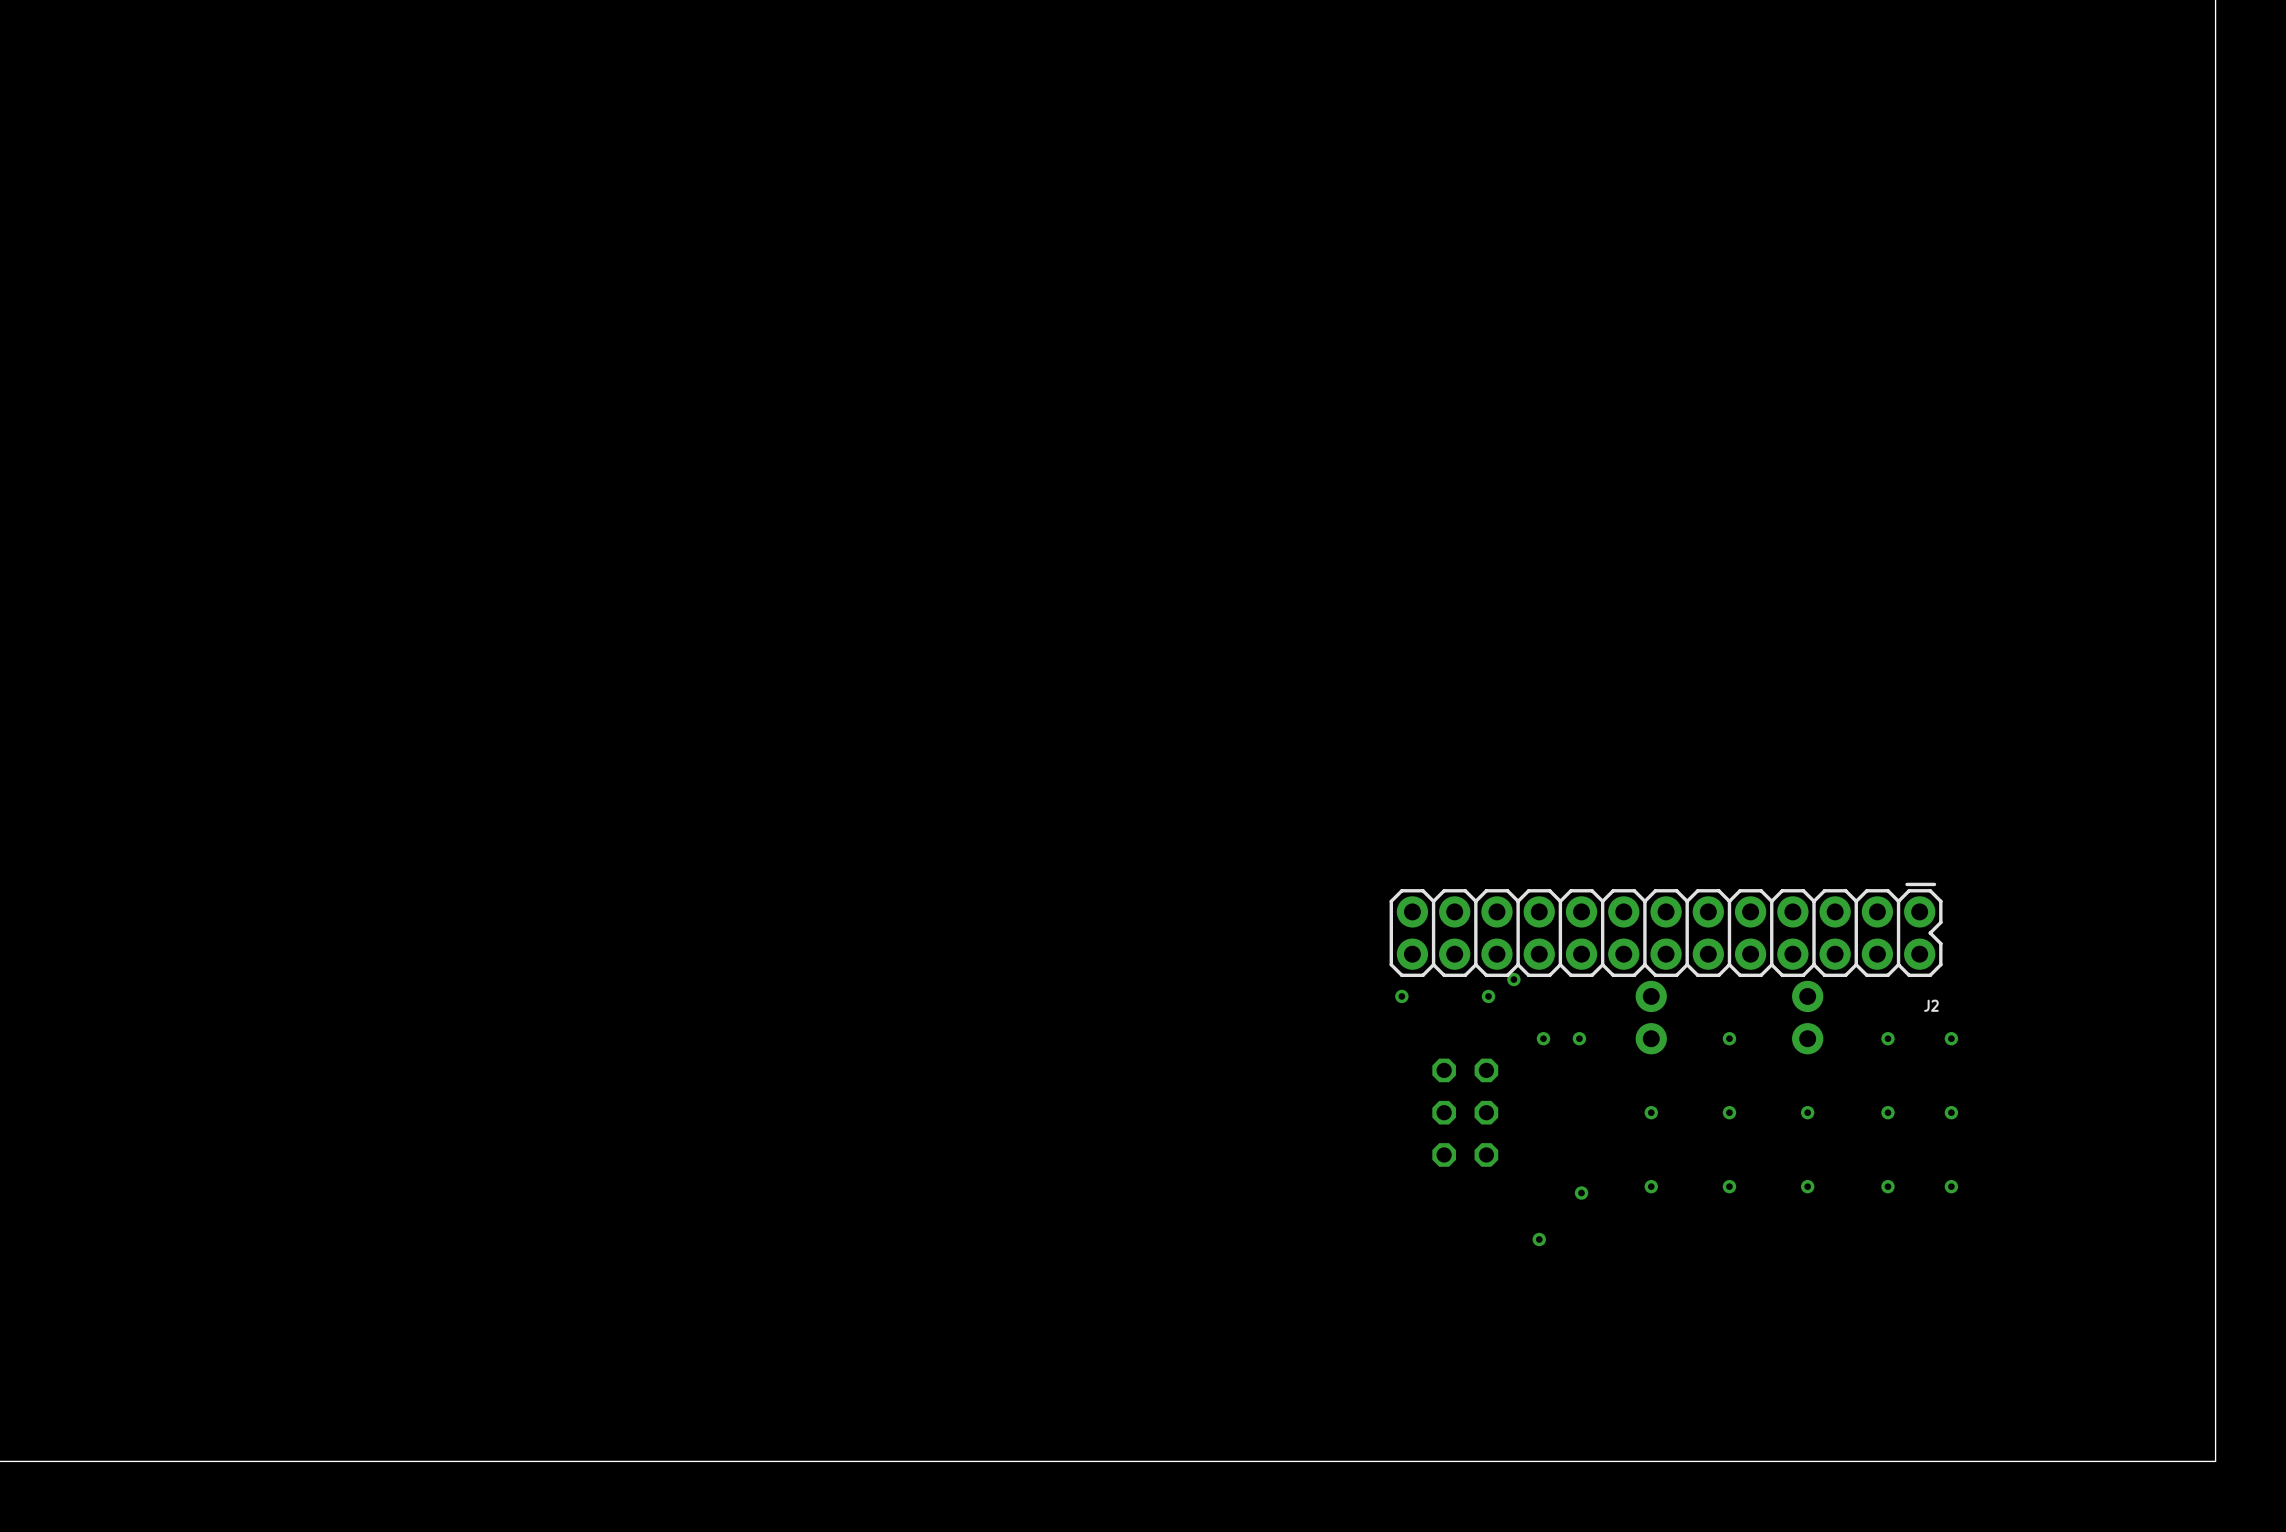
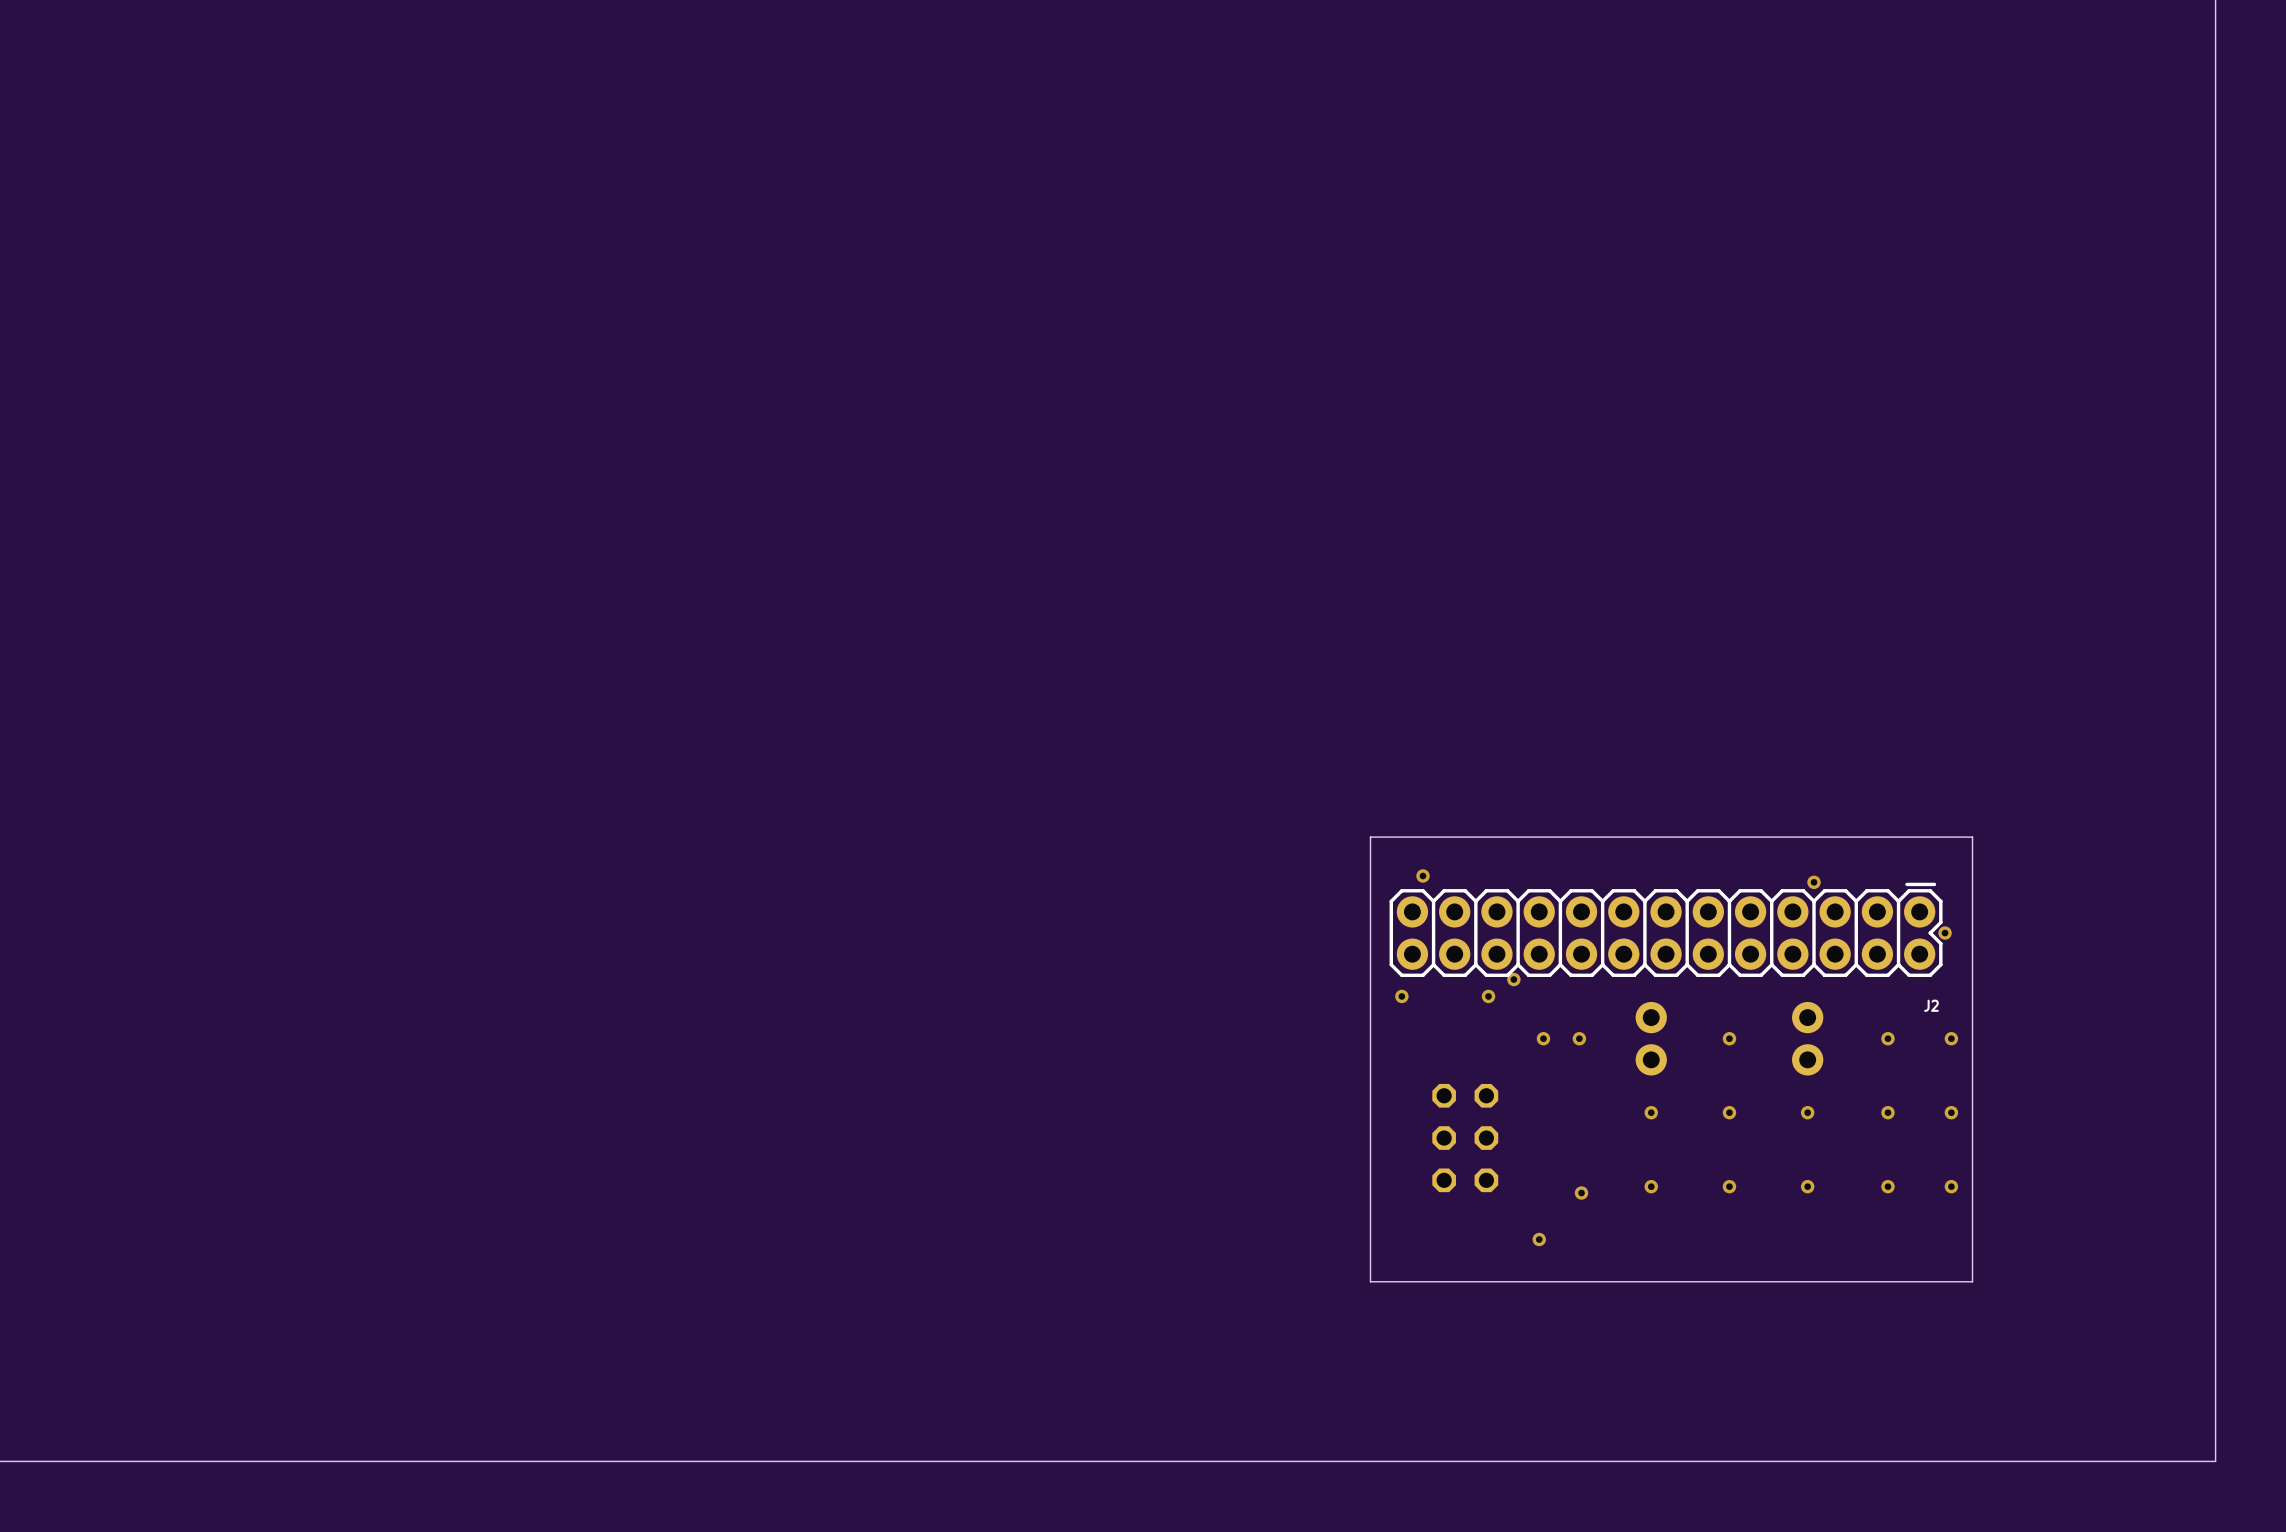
board edge: none -> (1972, 837) (1370, 837) (1370, 1281) (1972, 1281) (1972, 837)
via: none -> (1423, 875)
via: none -> (1814, 882)
via: none -> (1945, 933)
part position: (1651, 1017) -> (1651, 1038)
part position: (1807, 1017) -> (1807, 1038)
part position: (1465, 1112) -> (1465, 1138)

